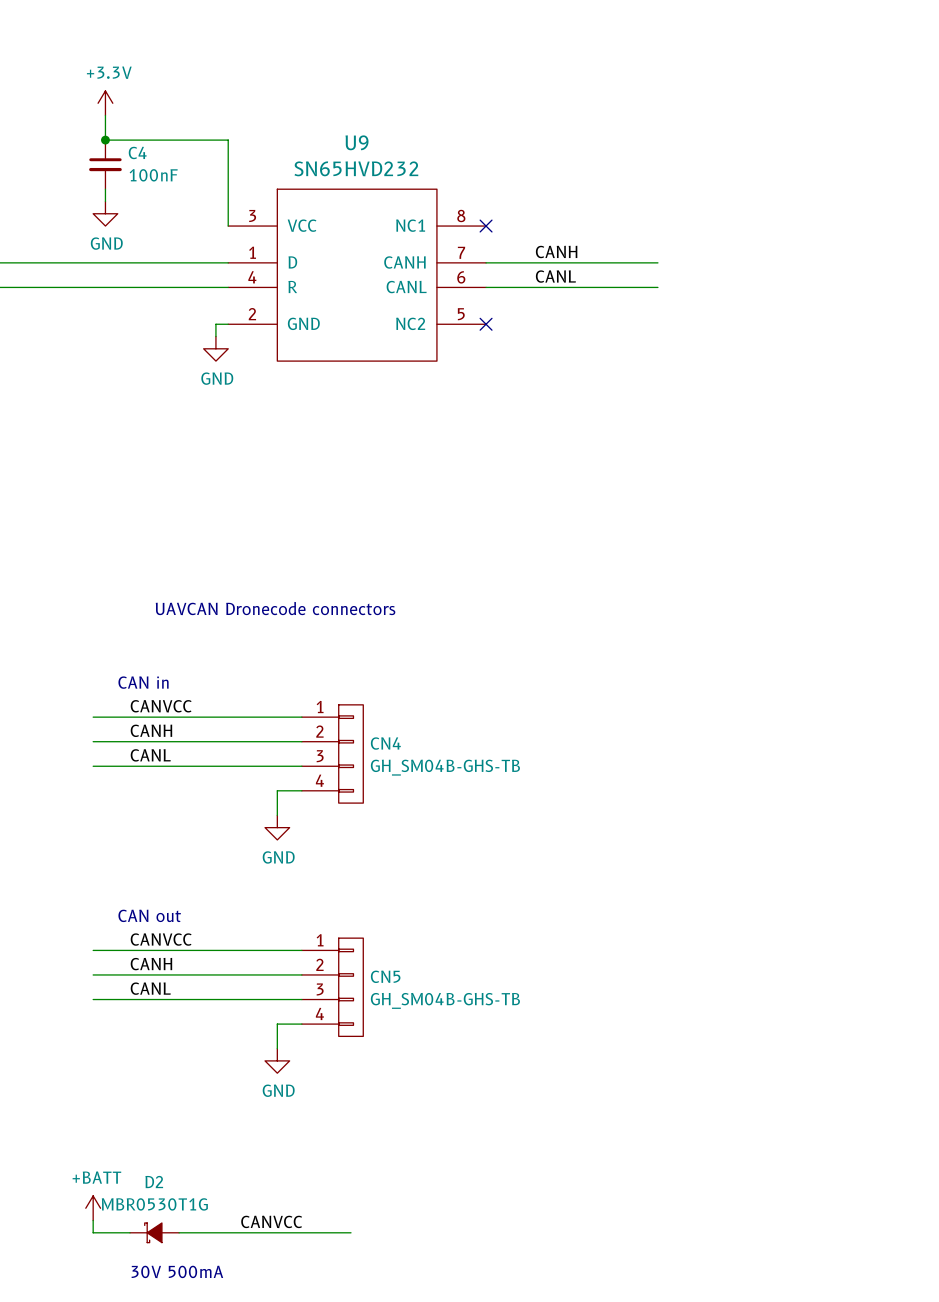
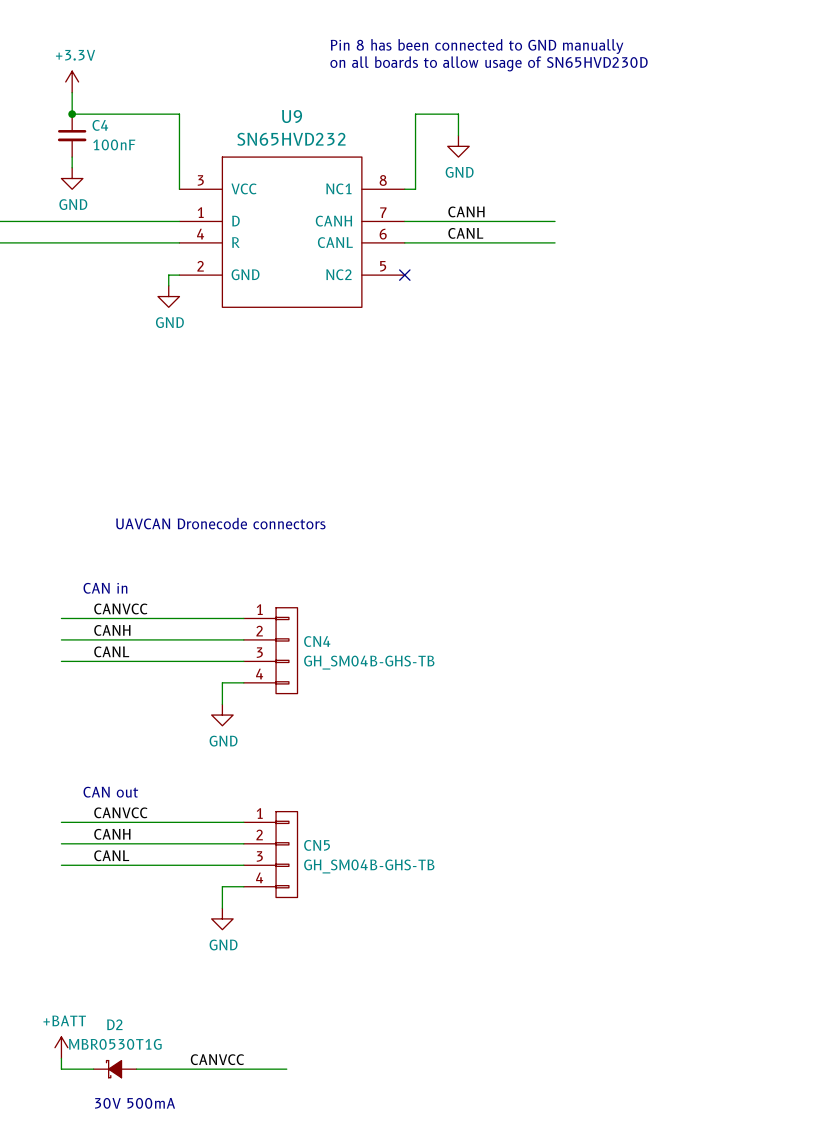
text: none -> Pin 8 has been connected to GND manually (477, 46)
text: none -> on all boards to allow usage of SN65HVD230D (489, 63)
wire: none -> (458, 135) (458, 114) (415, 114) (415, 189) (404, 189)
power symbol: none -> GND (458, 146)
no-connect mark: (486, 226) -> none

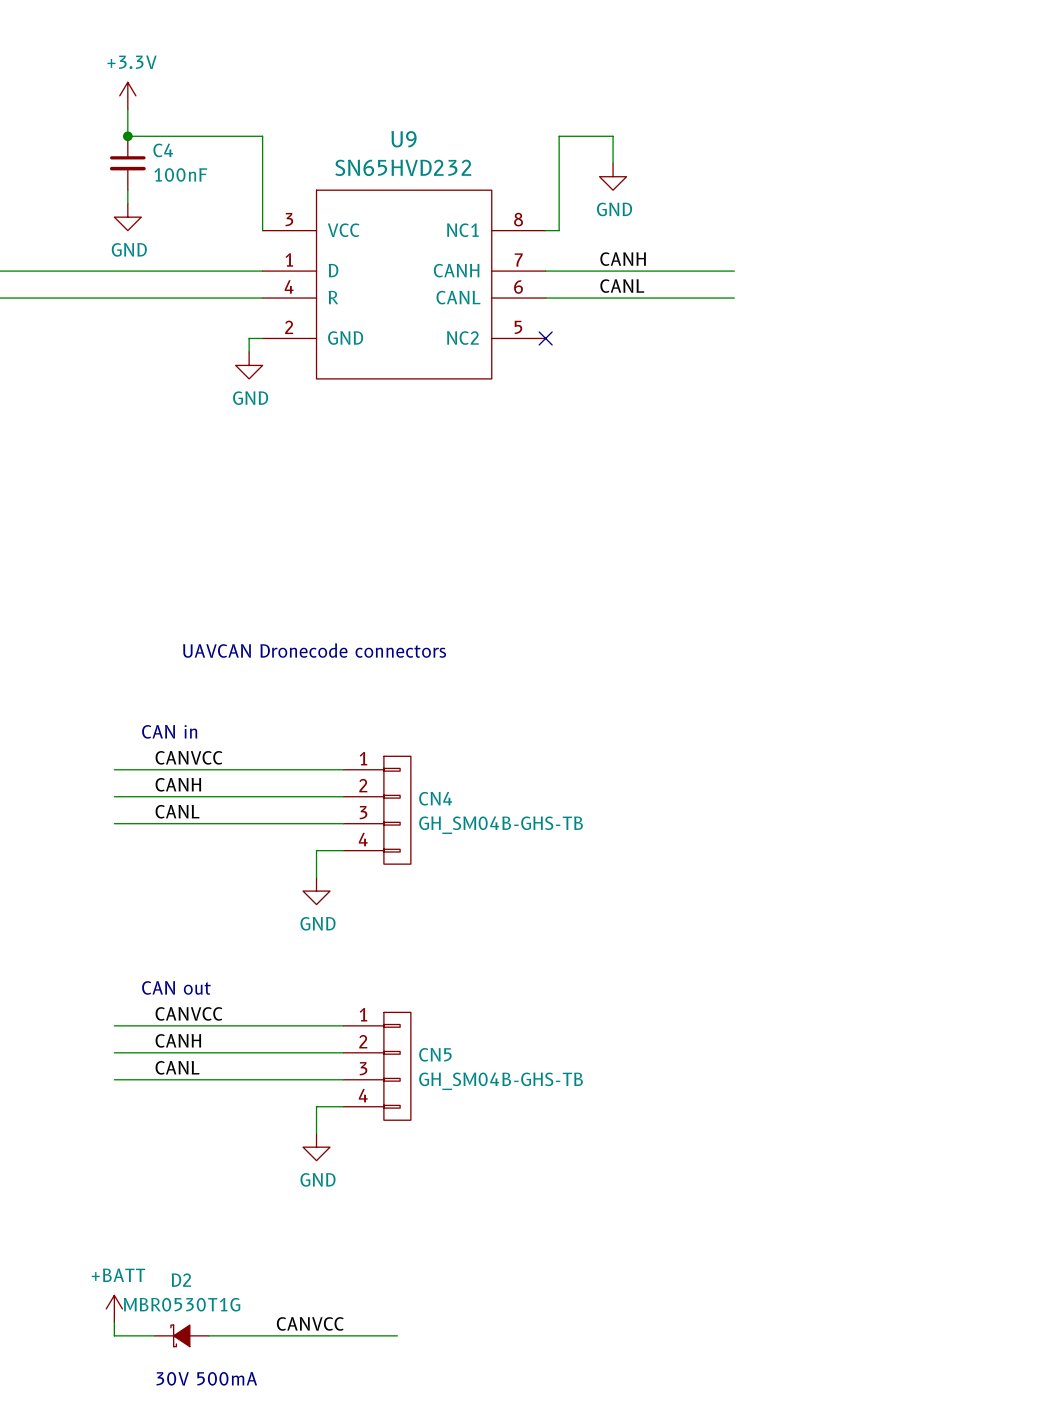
text: Pin 8 has been connected to GND manually (477, 46) -> none
text: on all boards to allow usage of SN65HVD230D (489, 63) -> none

